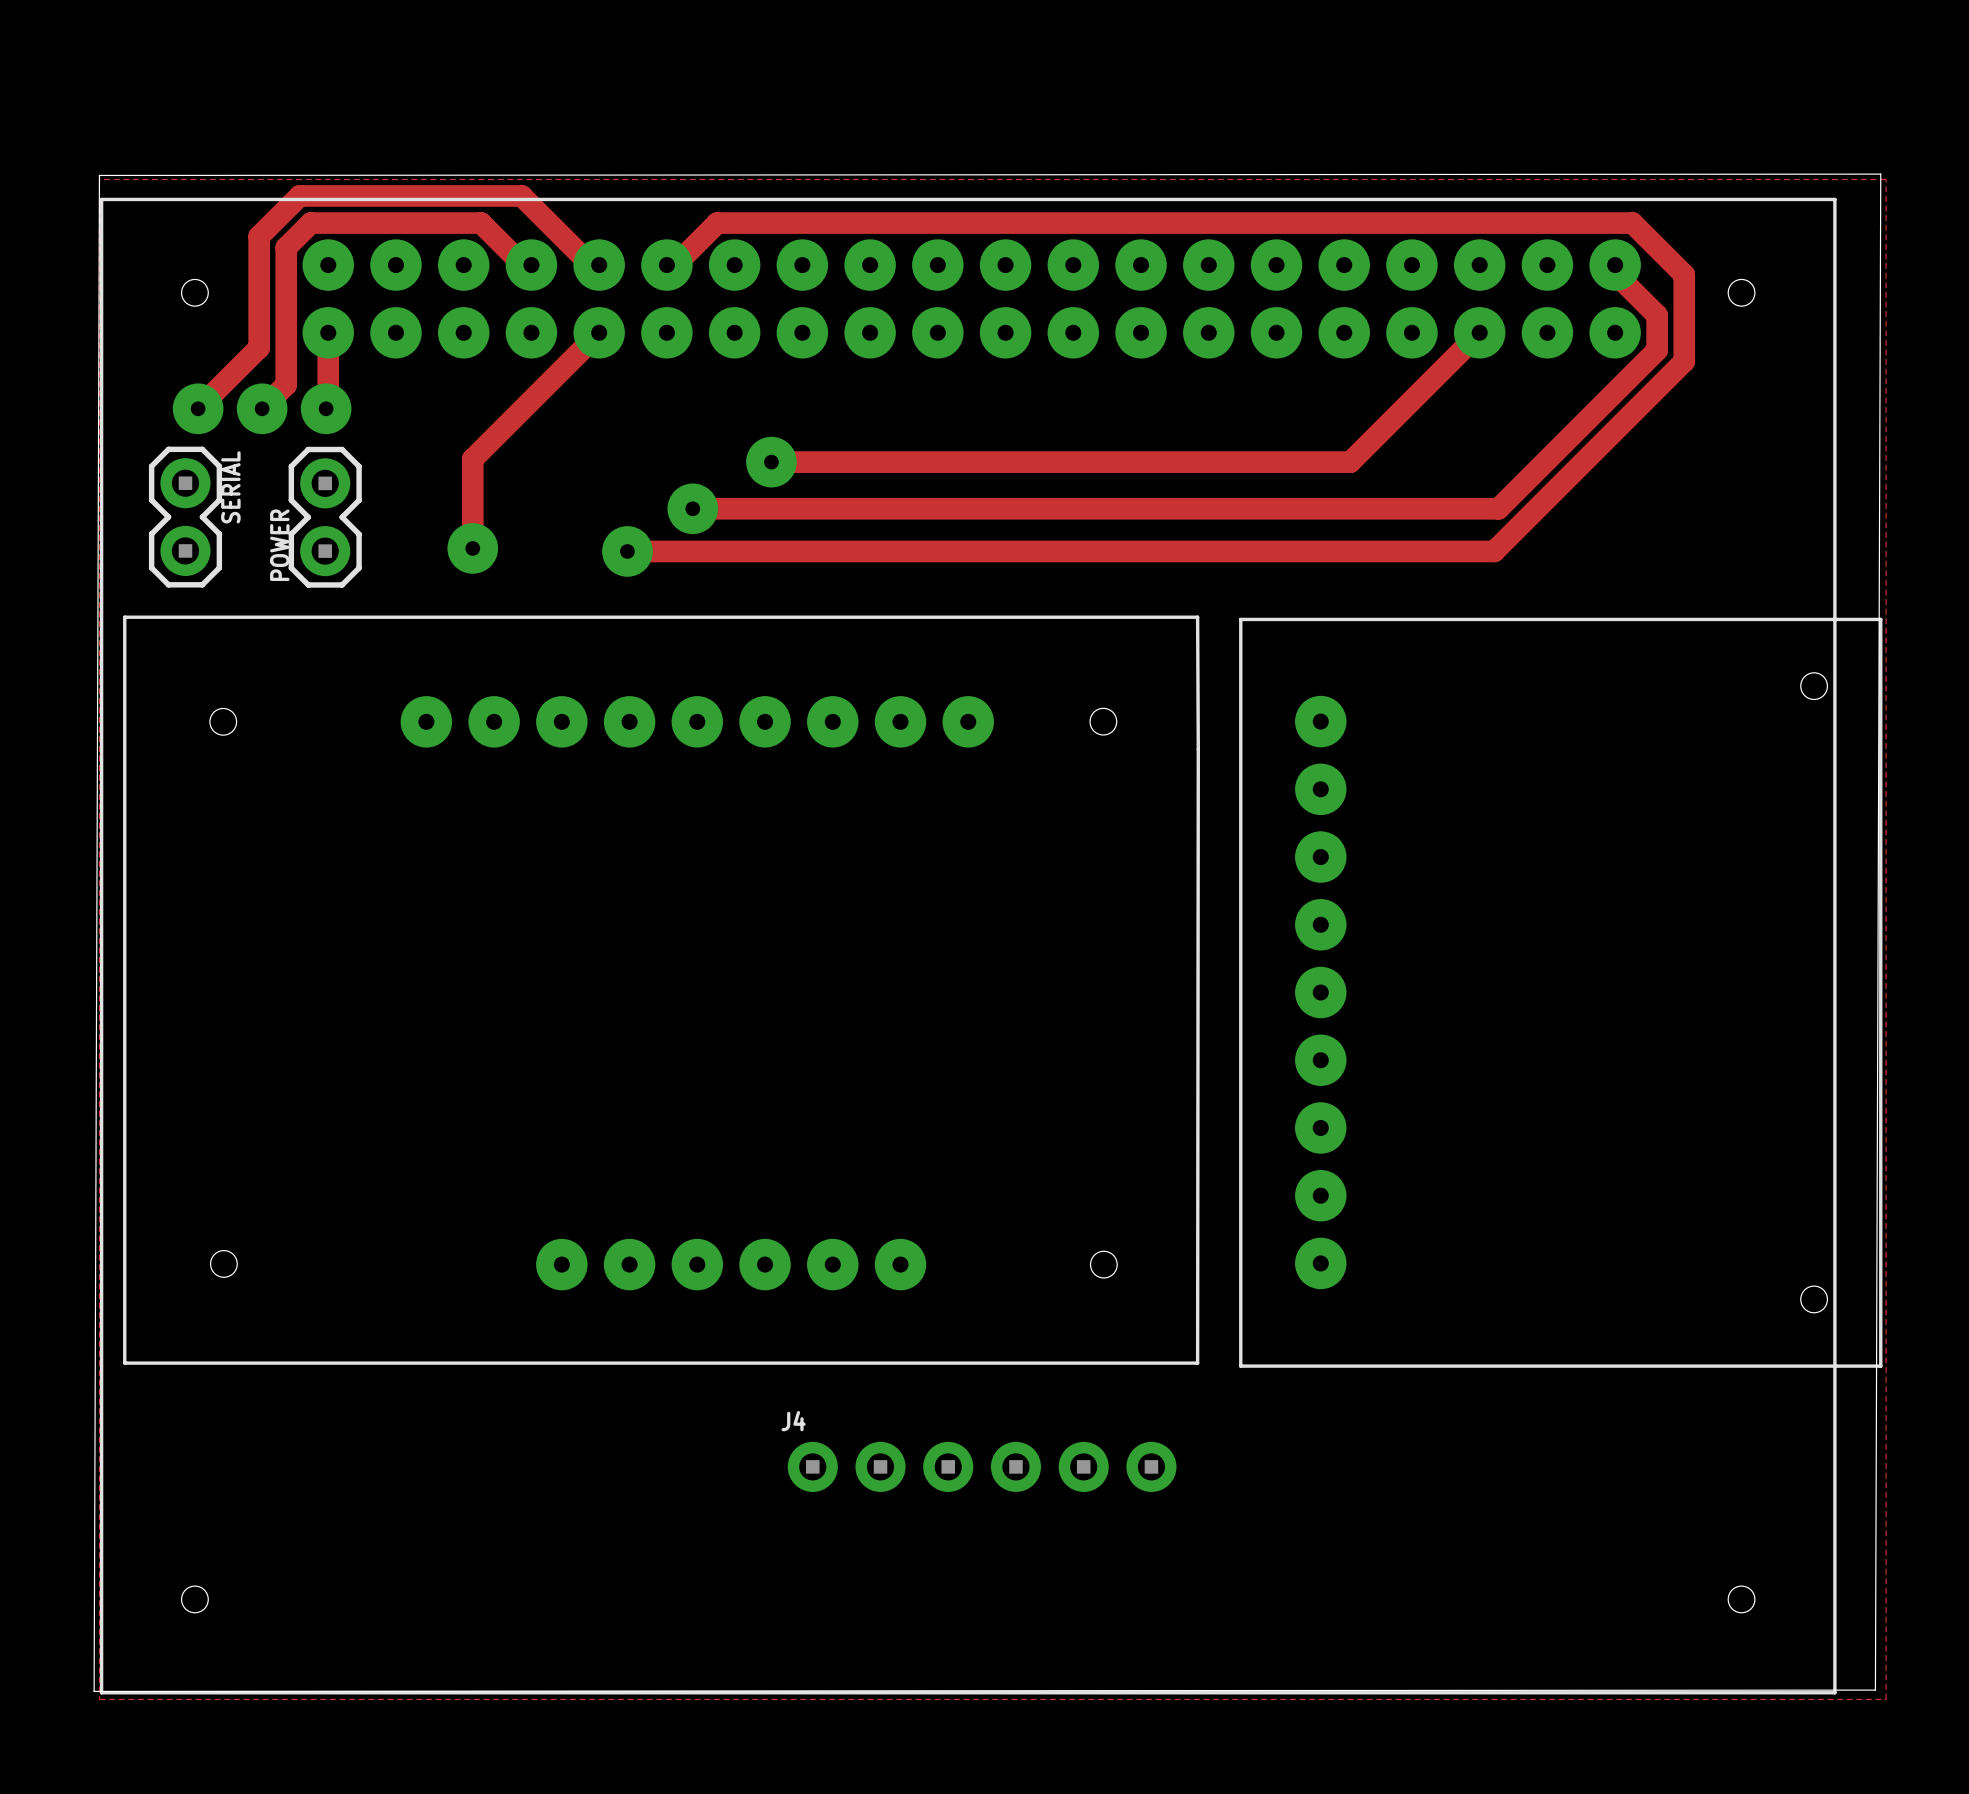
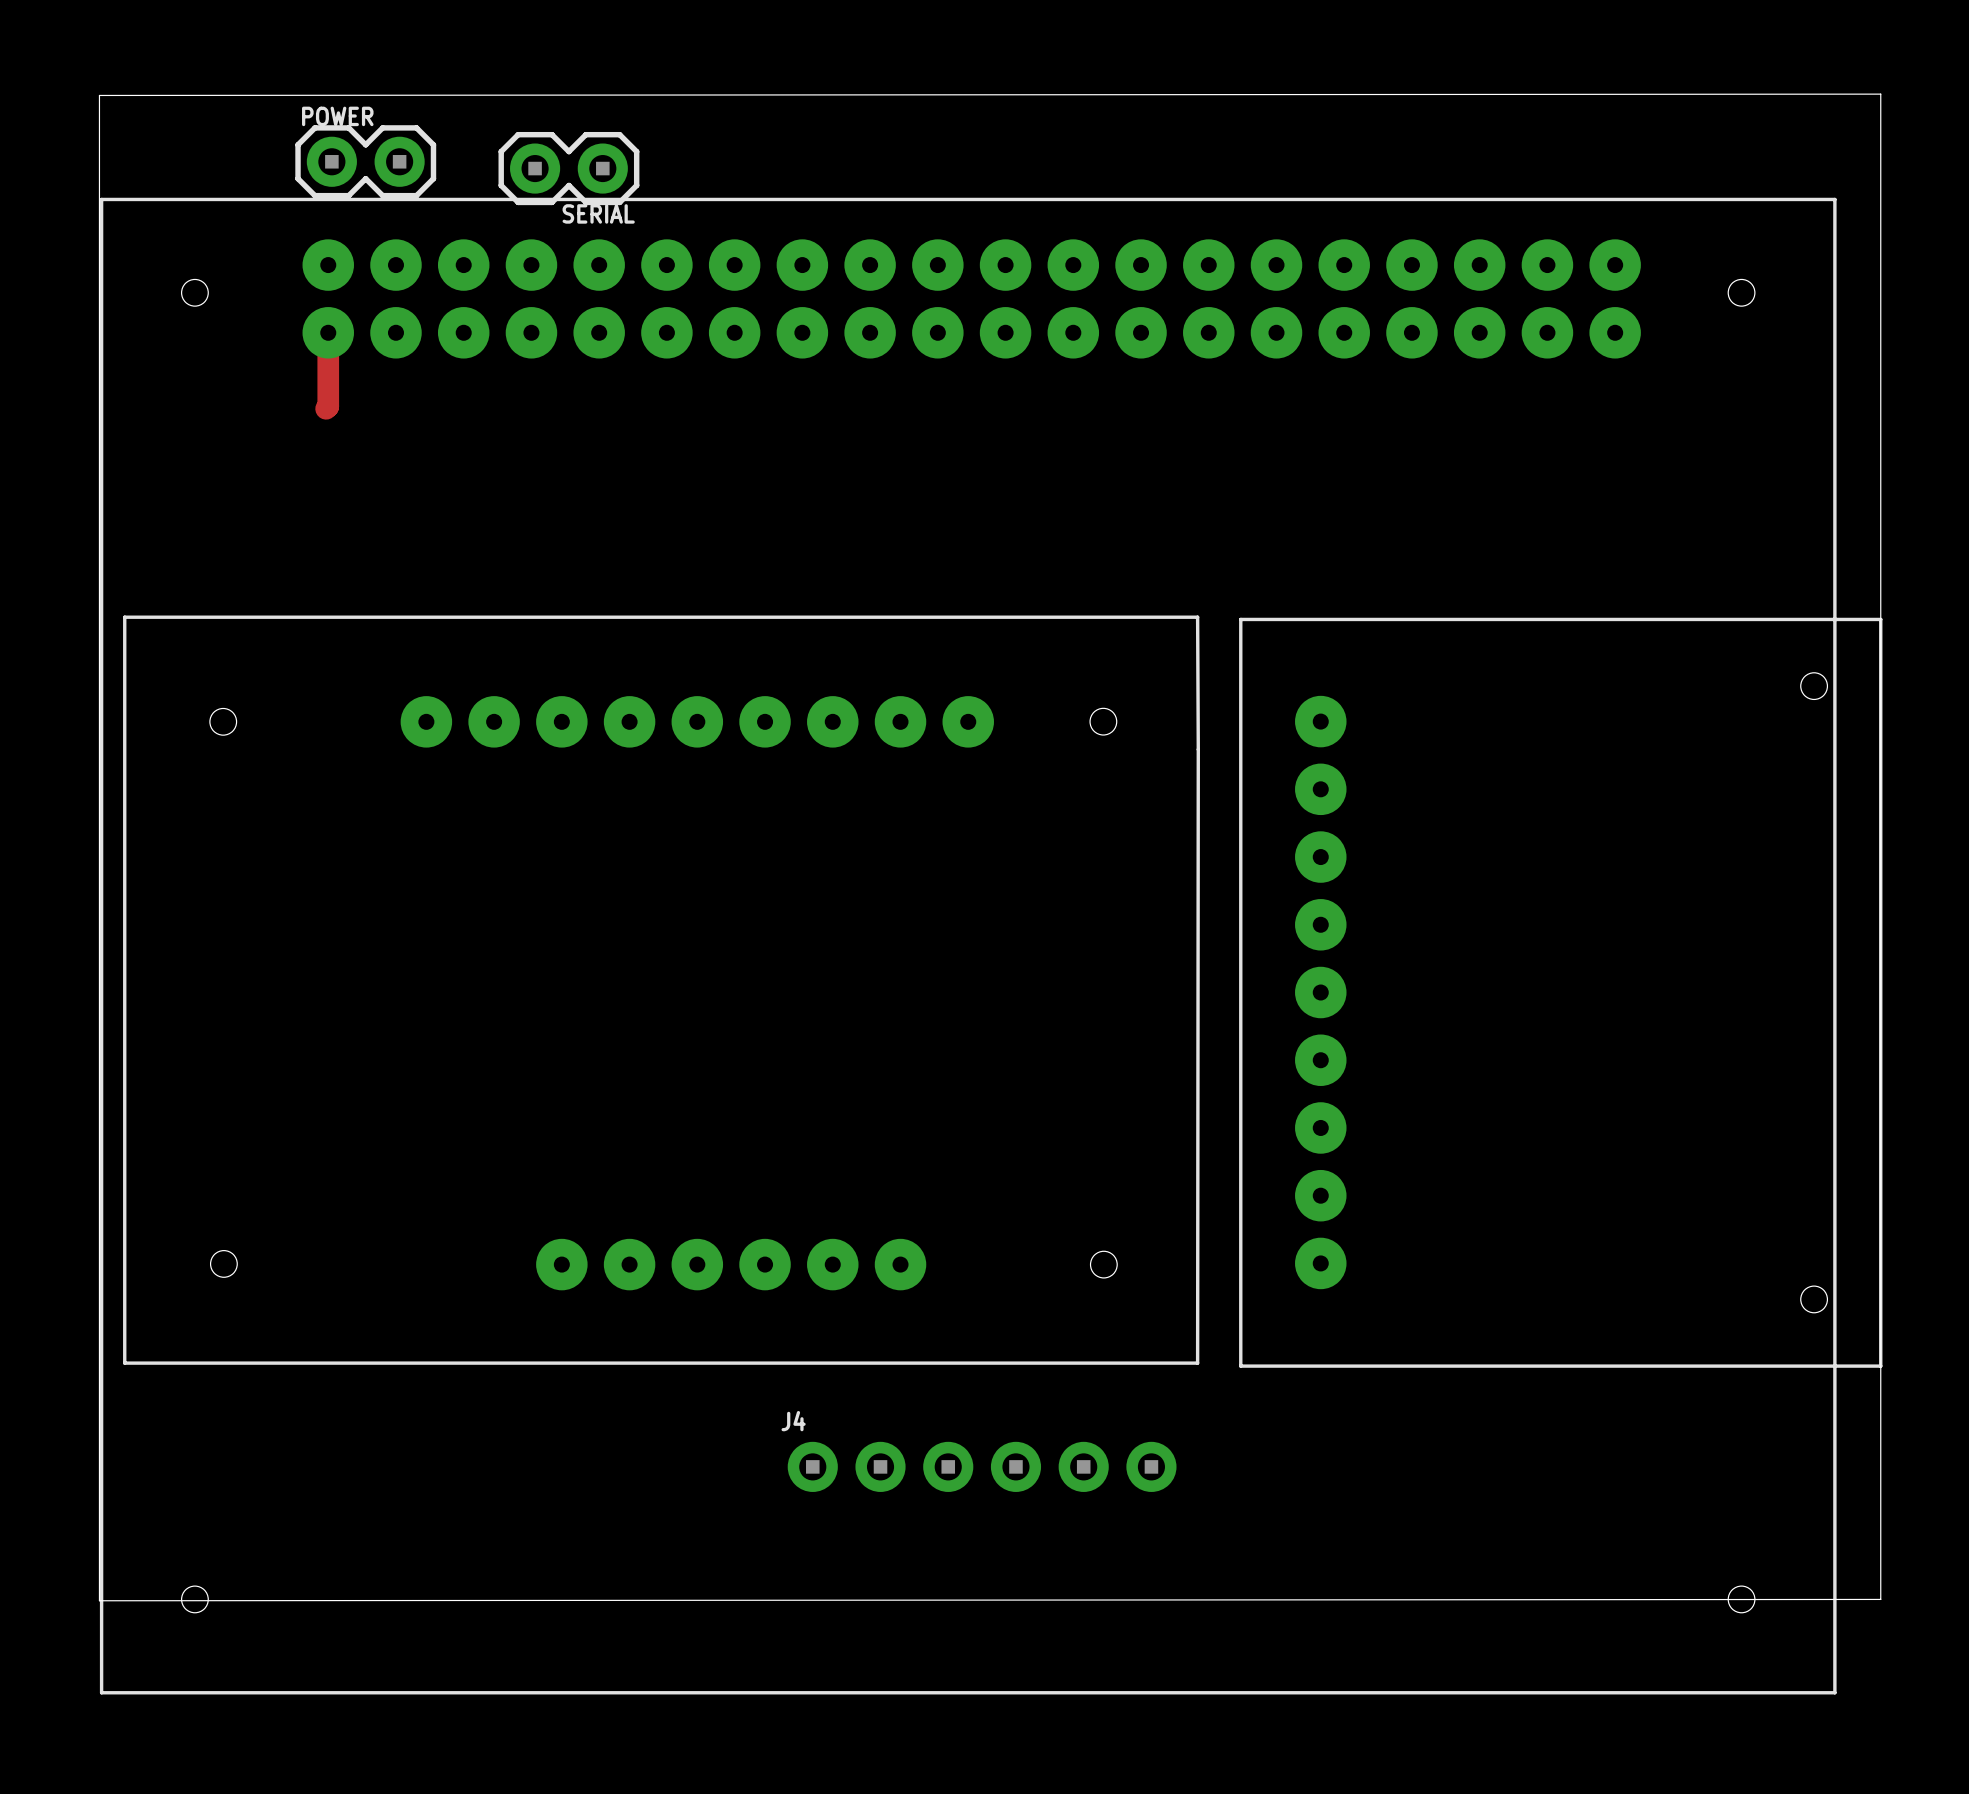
board edge: (1880, 174) (1875, 1690) (94, 1691) (99, 175) (1880, 174) -> (1880, 94) (99, 95) (99, 1600) (1880, 1599) (1880, 94)
zone outline: (99, 179) (99, 1699) (1886, 1699) (1886, 179) (99, 179) -> none
track: (531, 265) (523, 265) (481, 223) (310, 223) (286, 247) (286, 384) (262, 408) -> none
track: (599, 265) (590, 265) (521, 195) (299, 195) (259, 236) (259, 347) (198, 408) -> none
track: (666, 265) (675, 265) (717, 223) (1632, 223) (1684, 274) (1684, 361) (1494, 551) (627, 551) -> none
track: (1615, 265) (1615, 273) (1657, 315) (1657, 350) (1498, 508) (692, 508) -> none
track: (599, 332) (472, 459) (472, 548) -> none
track: (1479, 332) (1350, 462) (771, 462) -> none
via: (198, 408) -> none
via: (262, 408) -> none
via: (326, 408) -> none
via: (771, 462) -> none
via: (692, 508) -> none
SERIAL rotation: 0° (185, 517) -> 90° clockwise (568, 168)
SERIAL position: (185, 517) -> (568, 168)
POWER rotation: 0° (325, 517) -> 90° clockwise (365, 161)
POWER position: (325, 517) -> (365, 161)
via: (472, 548) -> none
via: (627, 551) -> none

